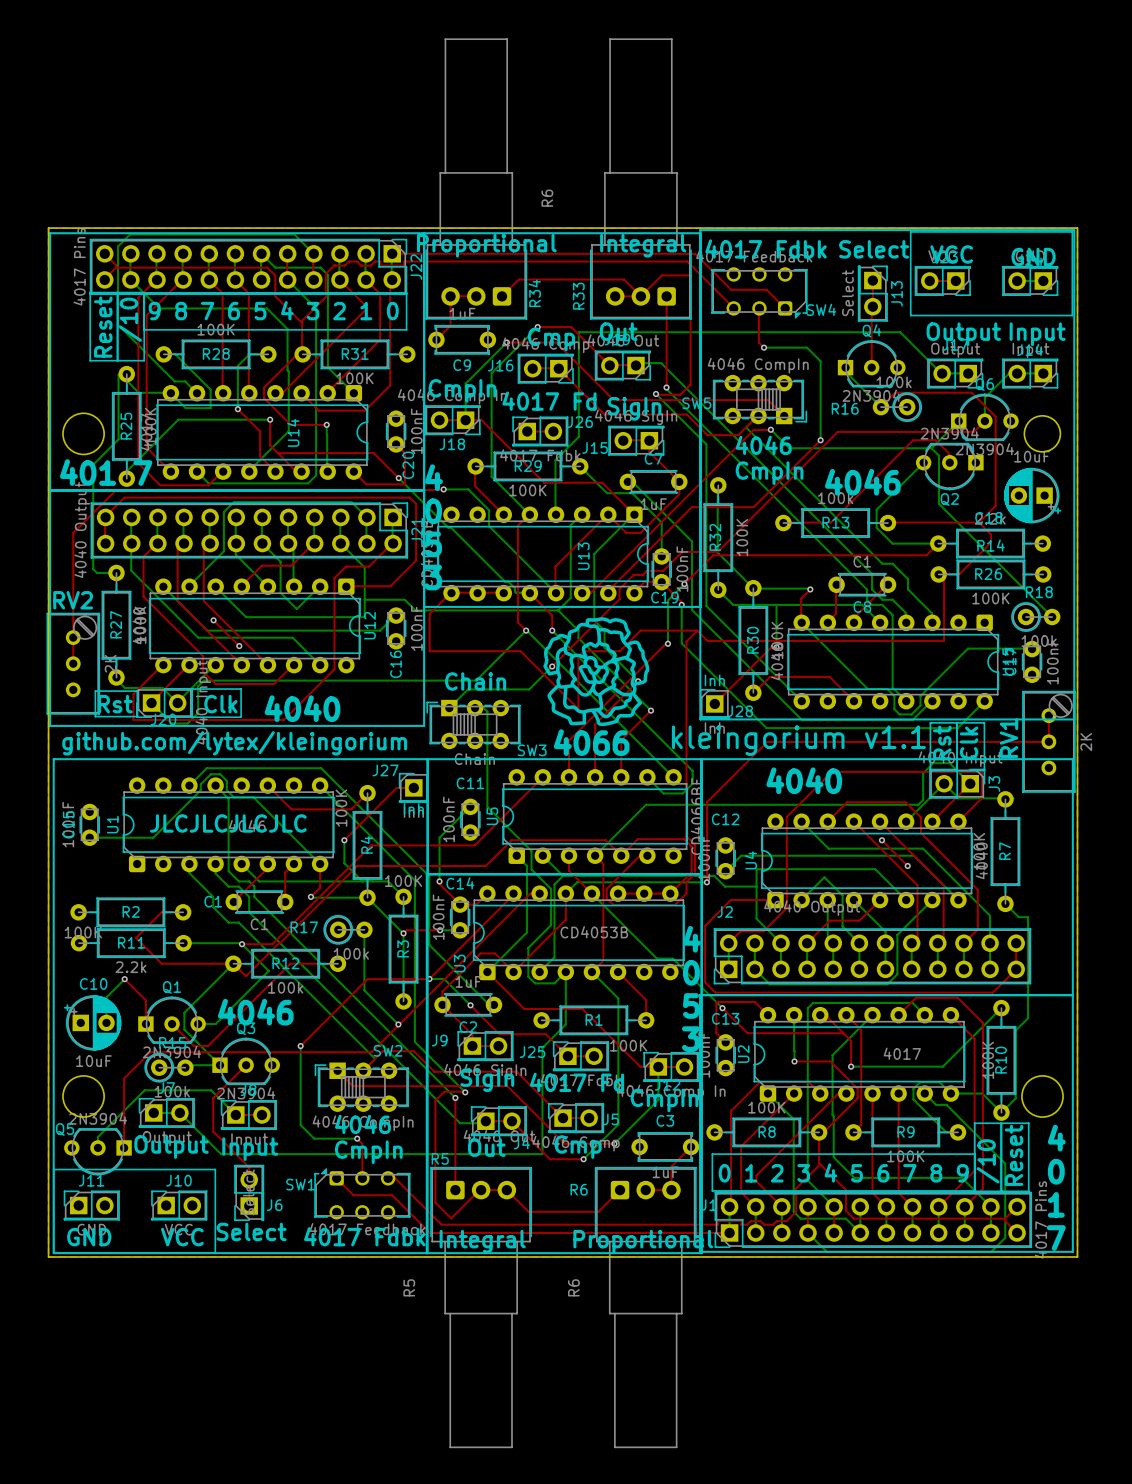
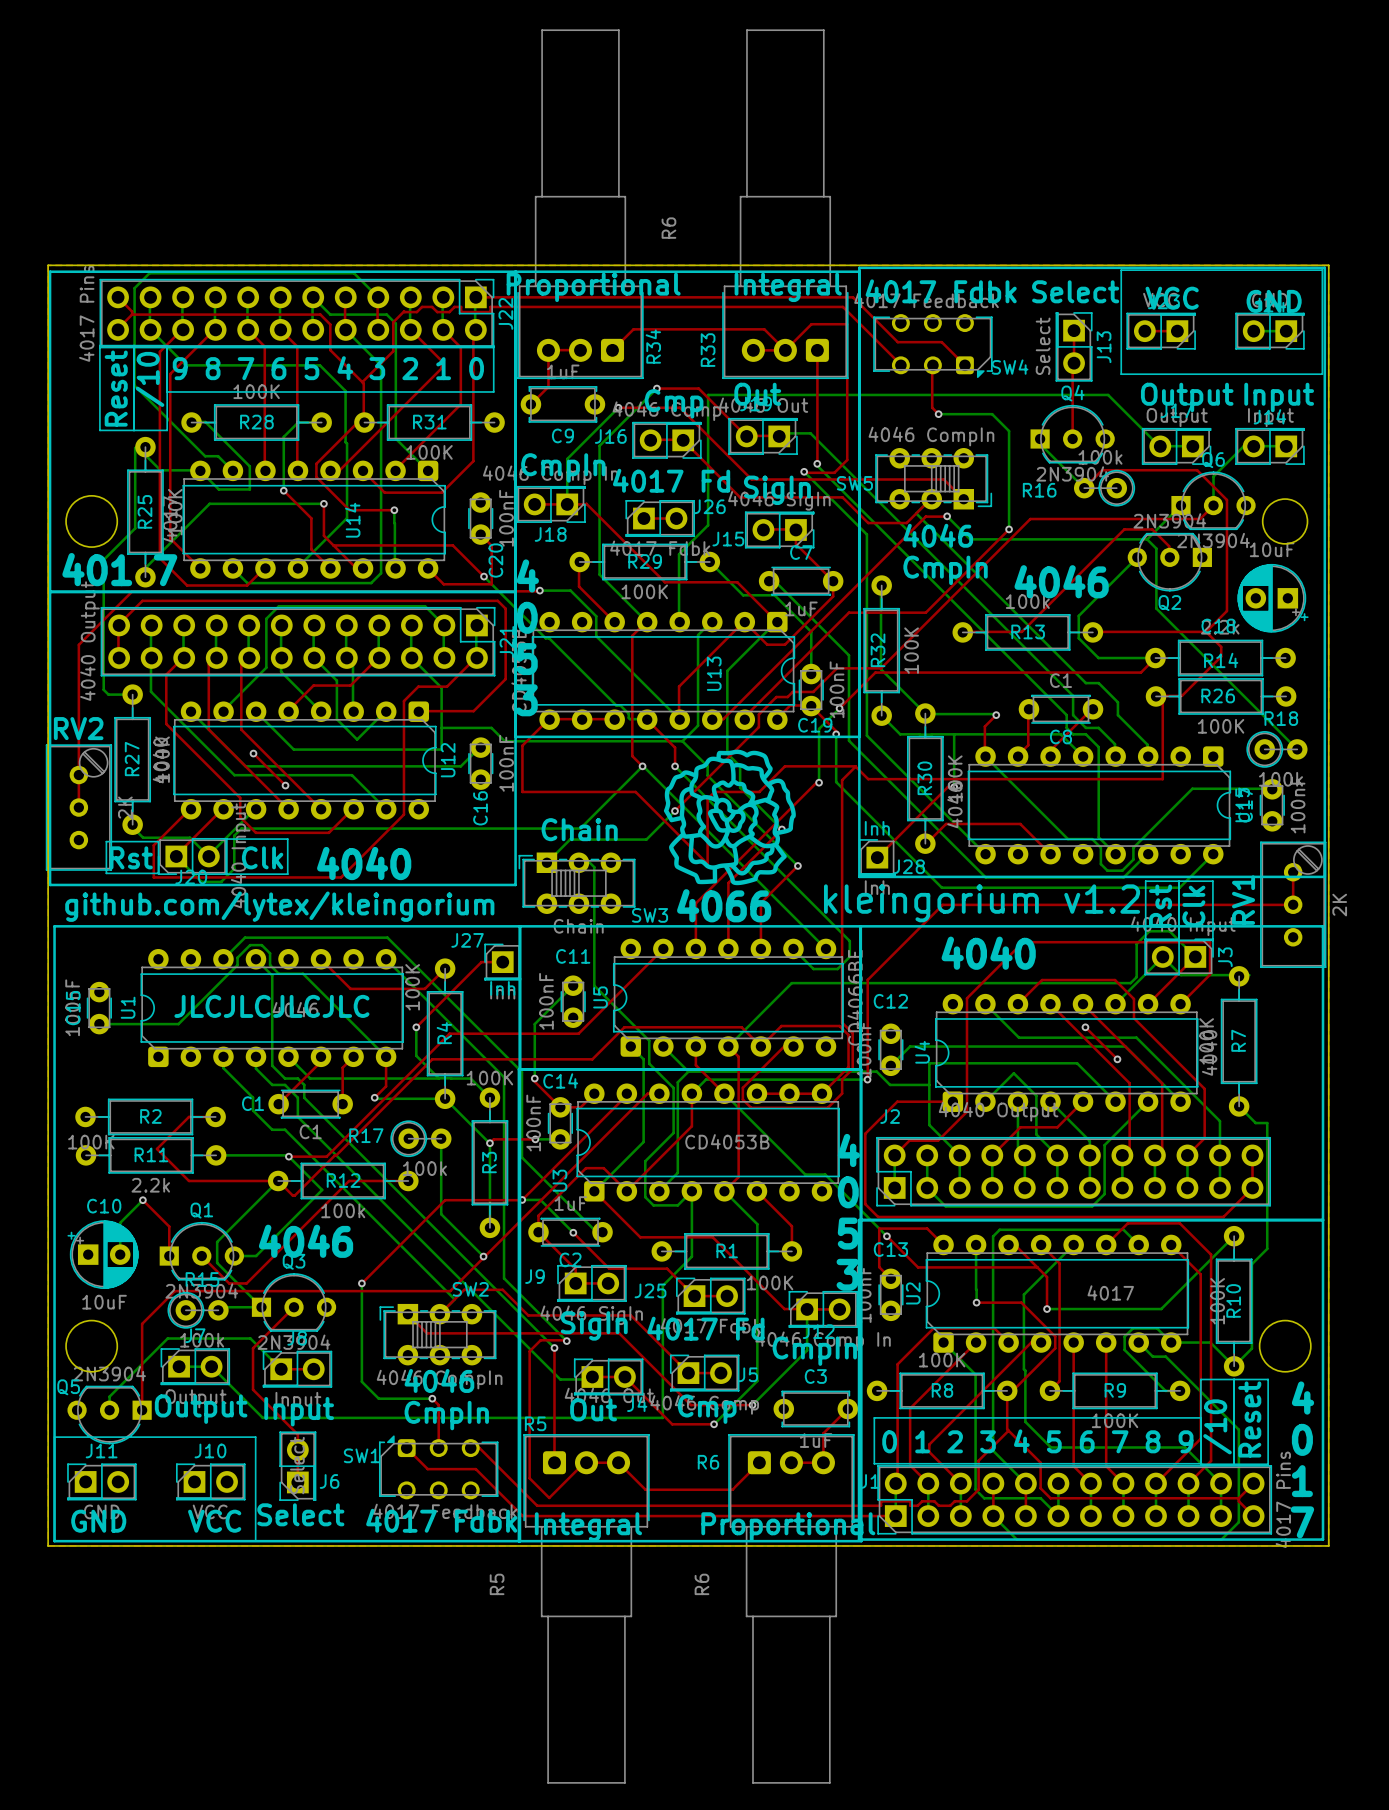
text: kleingorium v1.1 (798, 740) -> kleingorium v1.2 (982, 903)

